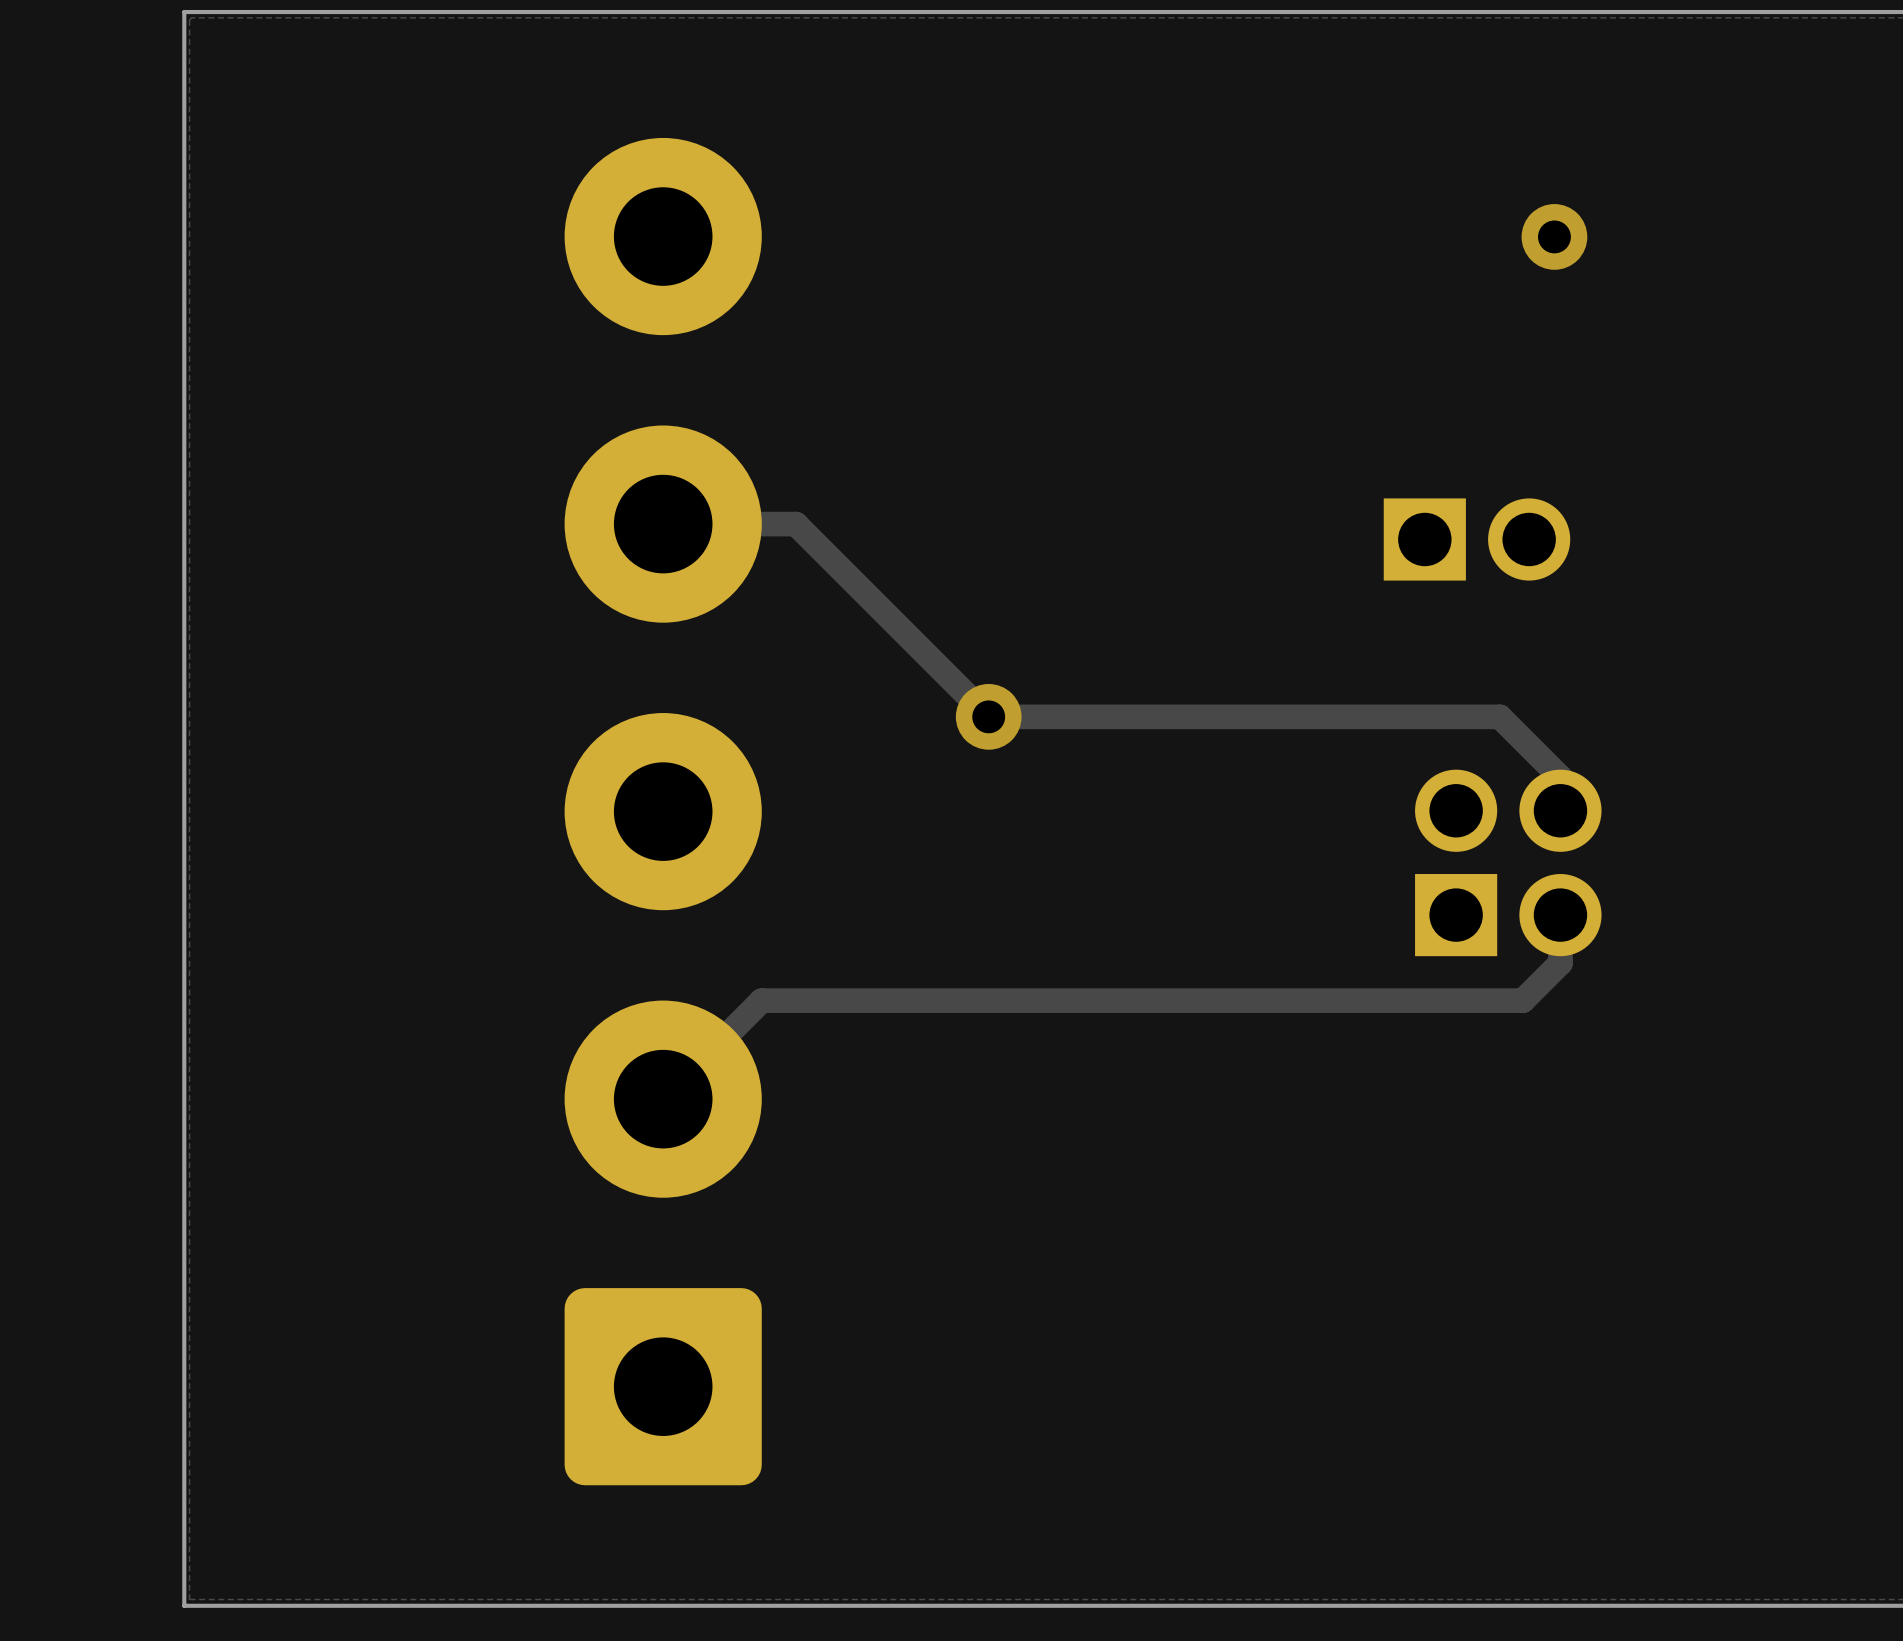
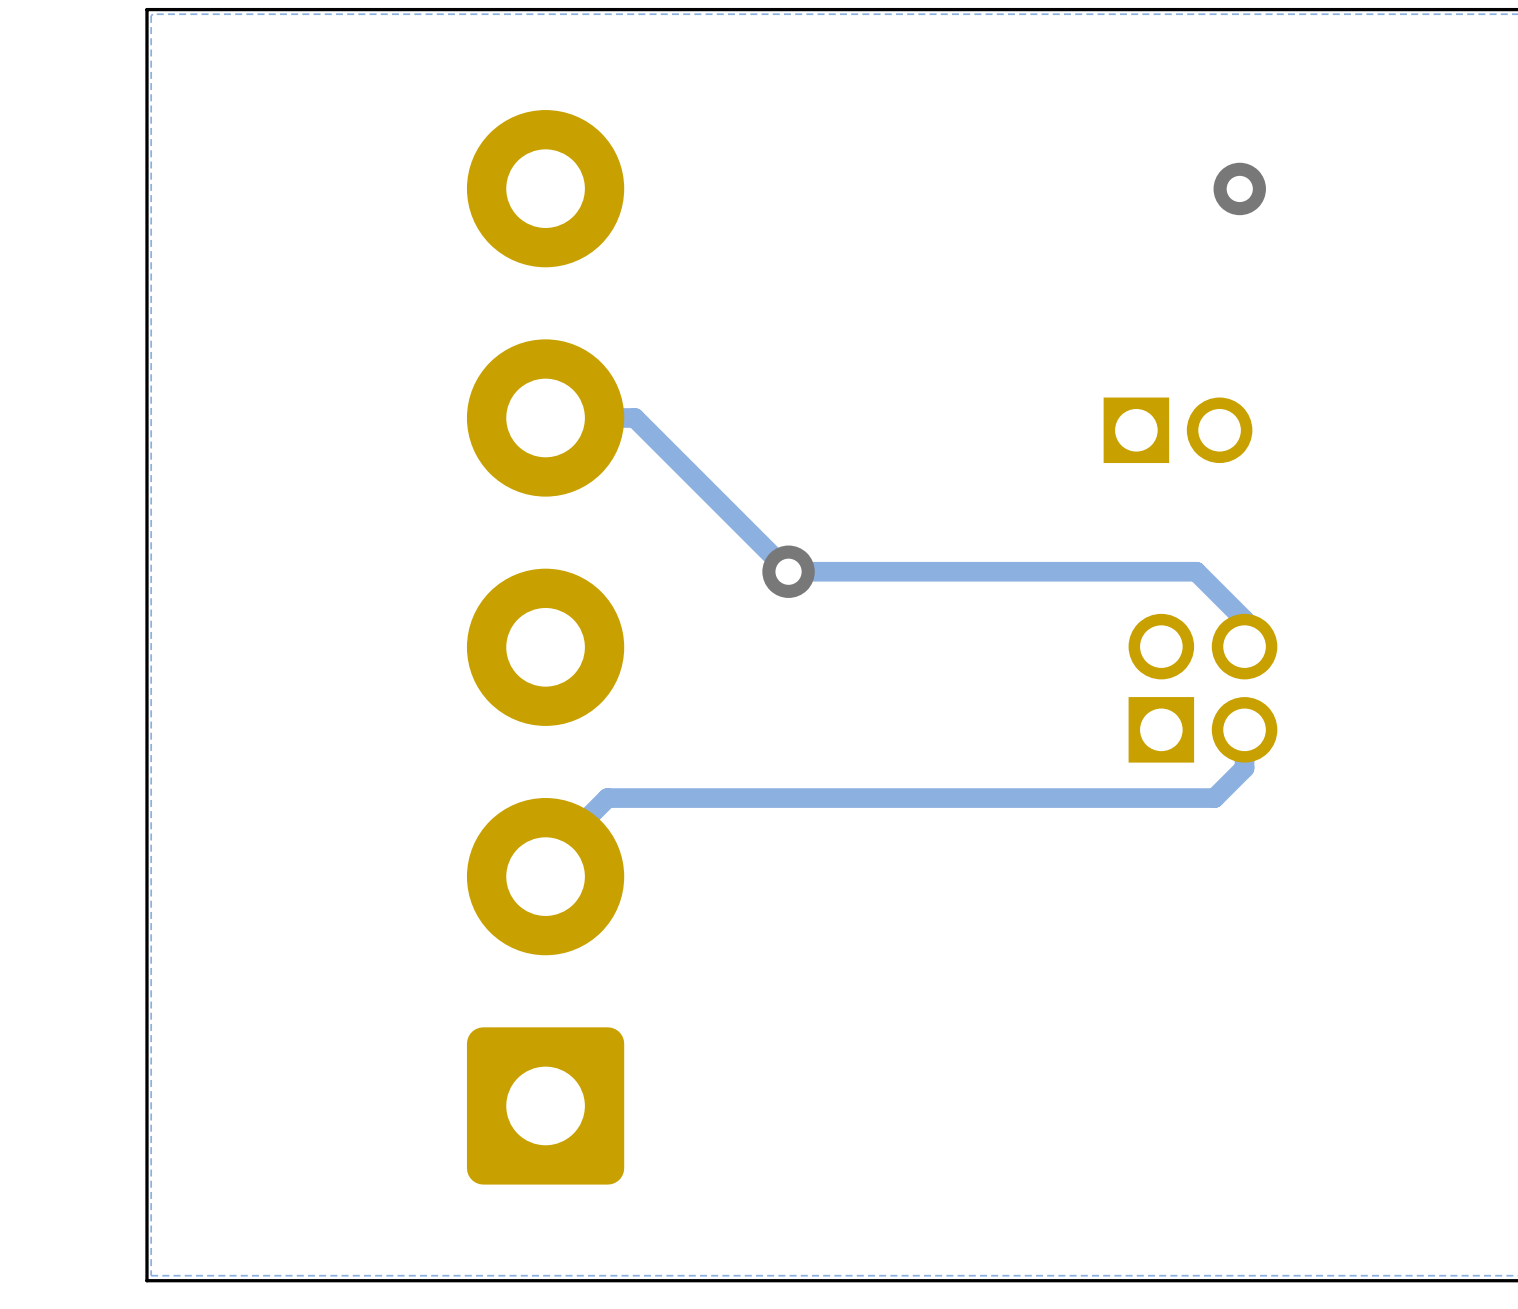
part position: (663, 811) -> (545, 647)

